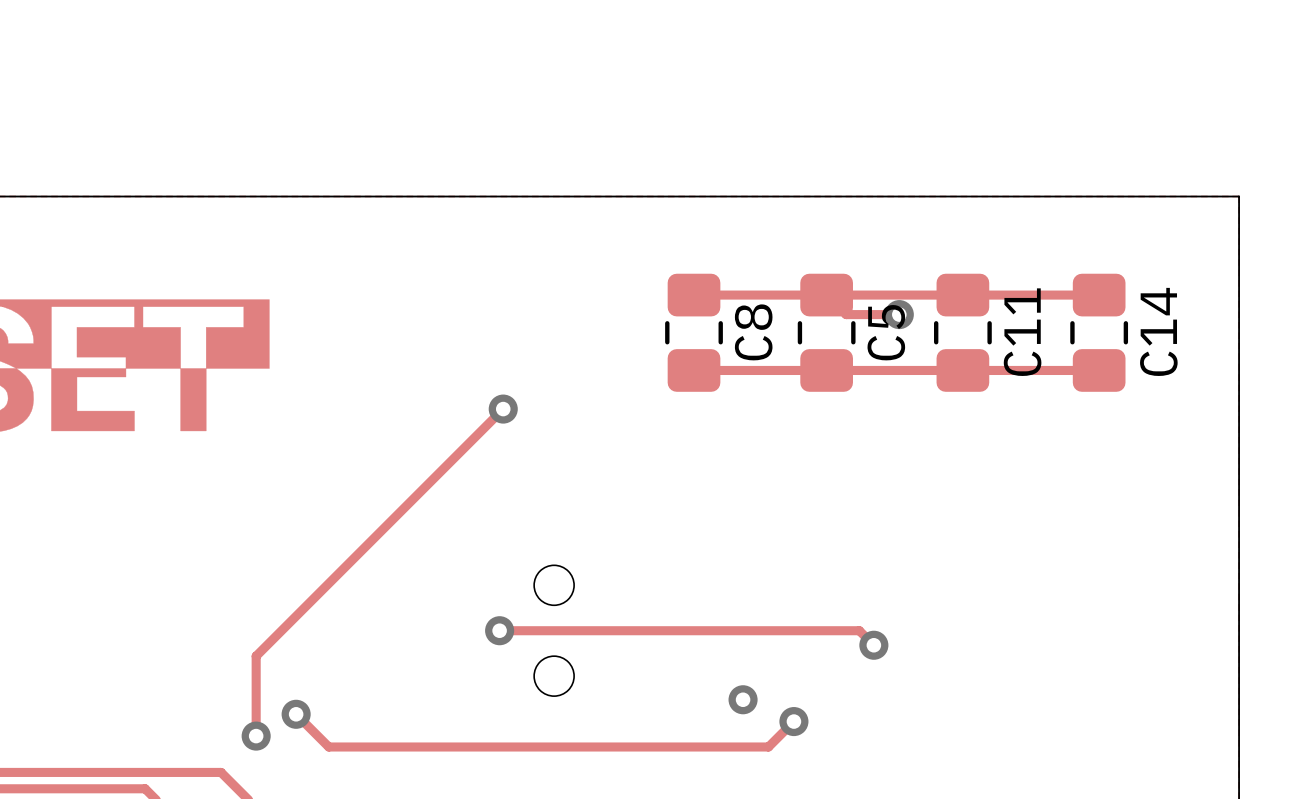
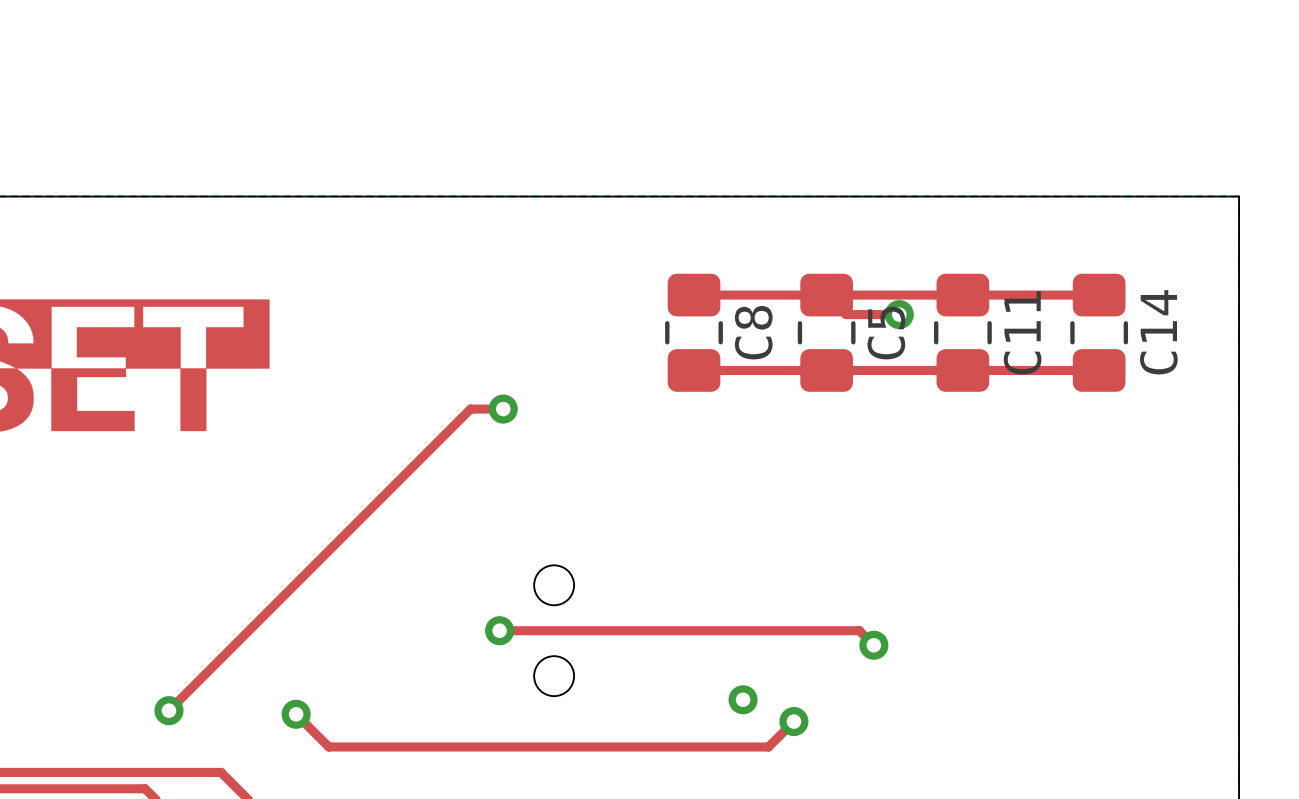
track: (503, 409) (256, 656) (256, 736) -> (503, 409) (470, 409) (168, 710)
via position: (256, 736) -> (168, 710)

